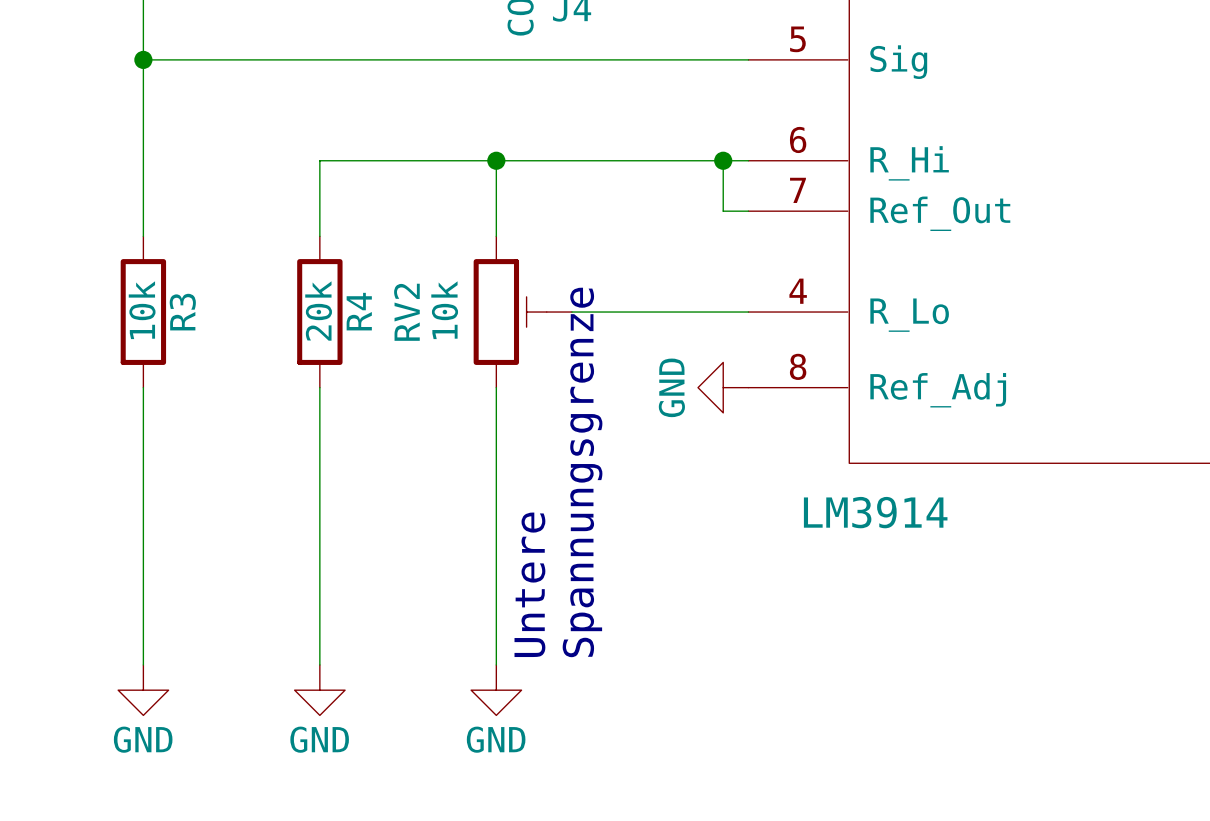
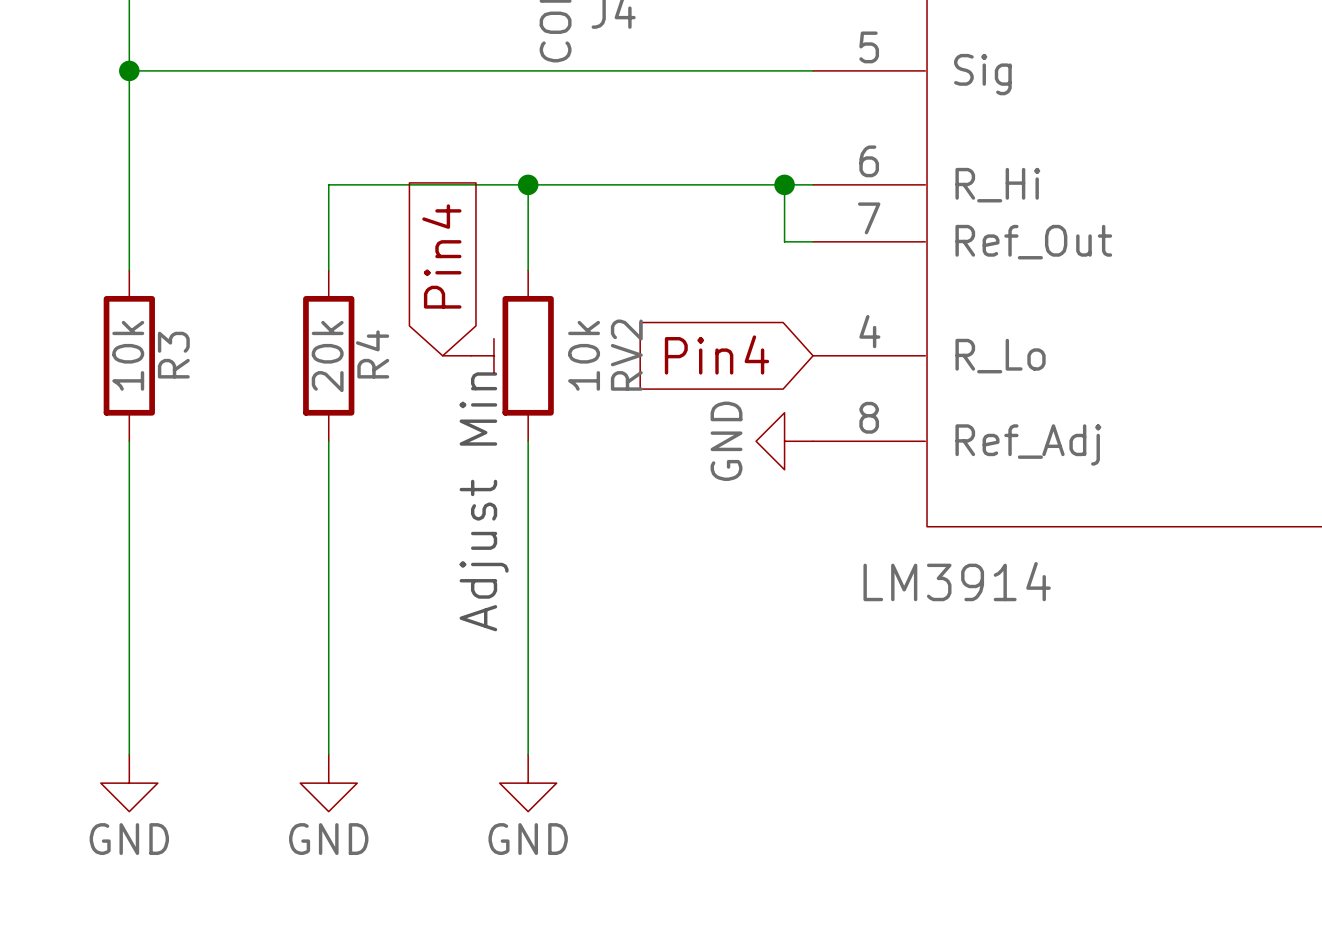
global label: none -> Pin4 (441, 256)
global label: none -> Pin4 (716, 354)
RV2 rotation: 0° (510, 312) -> 180° (512, 355)
wire: (571, 312) (748, 312) -> none
text: none -> Adjust Min (484, 501)
text: Spannungsgrenze (582, 472) -> none
text: Untere (529, 584) -> none

